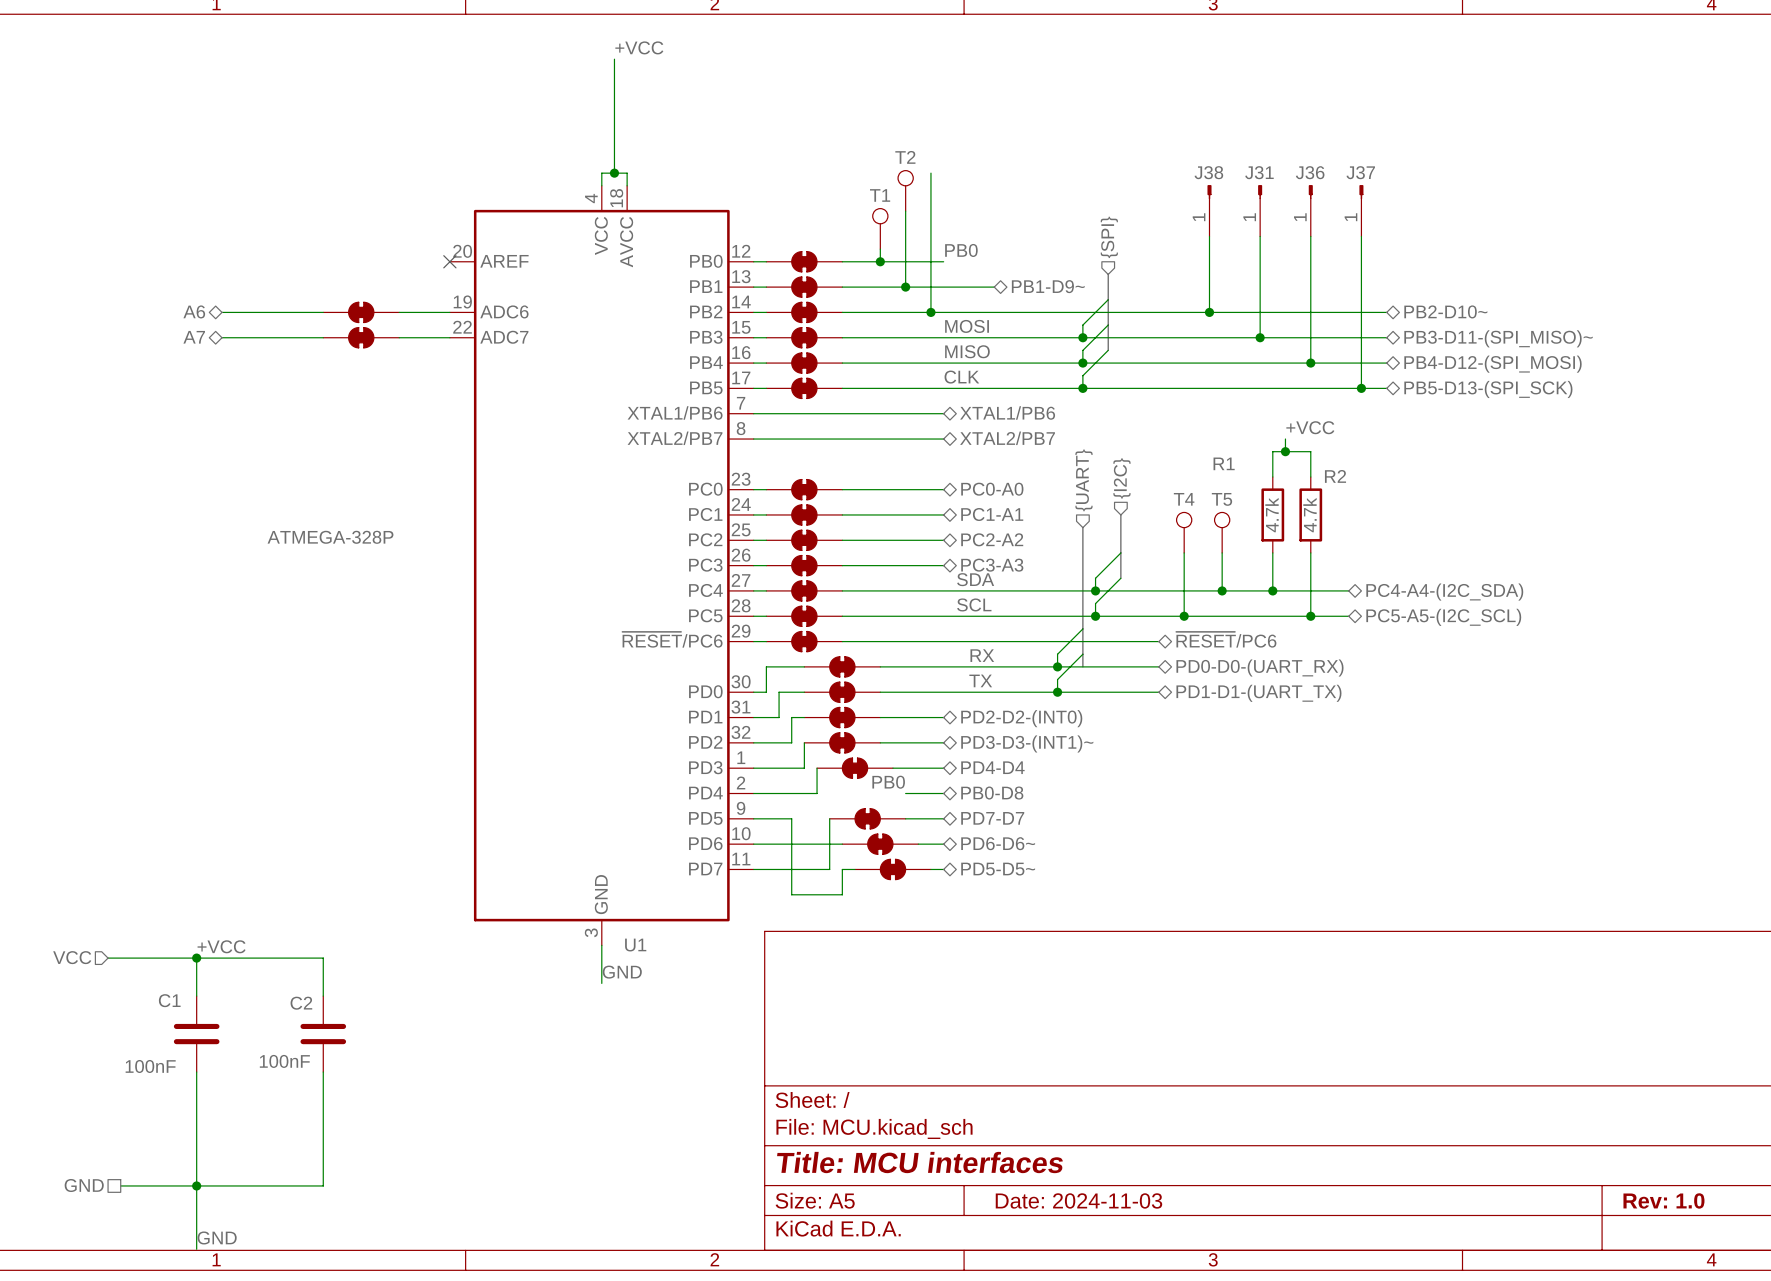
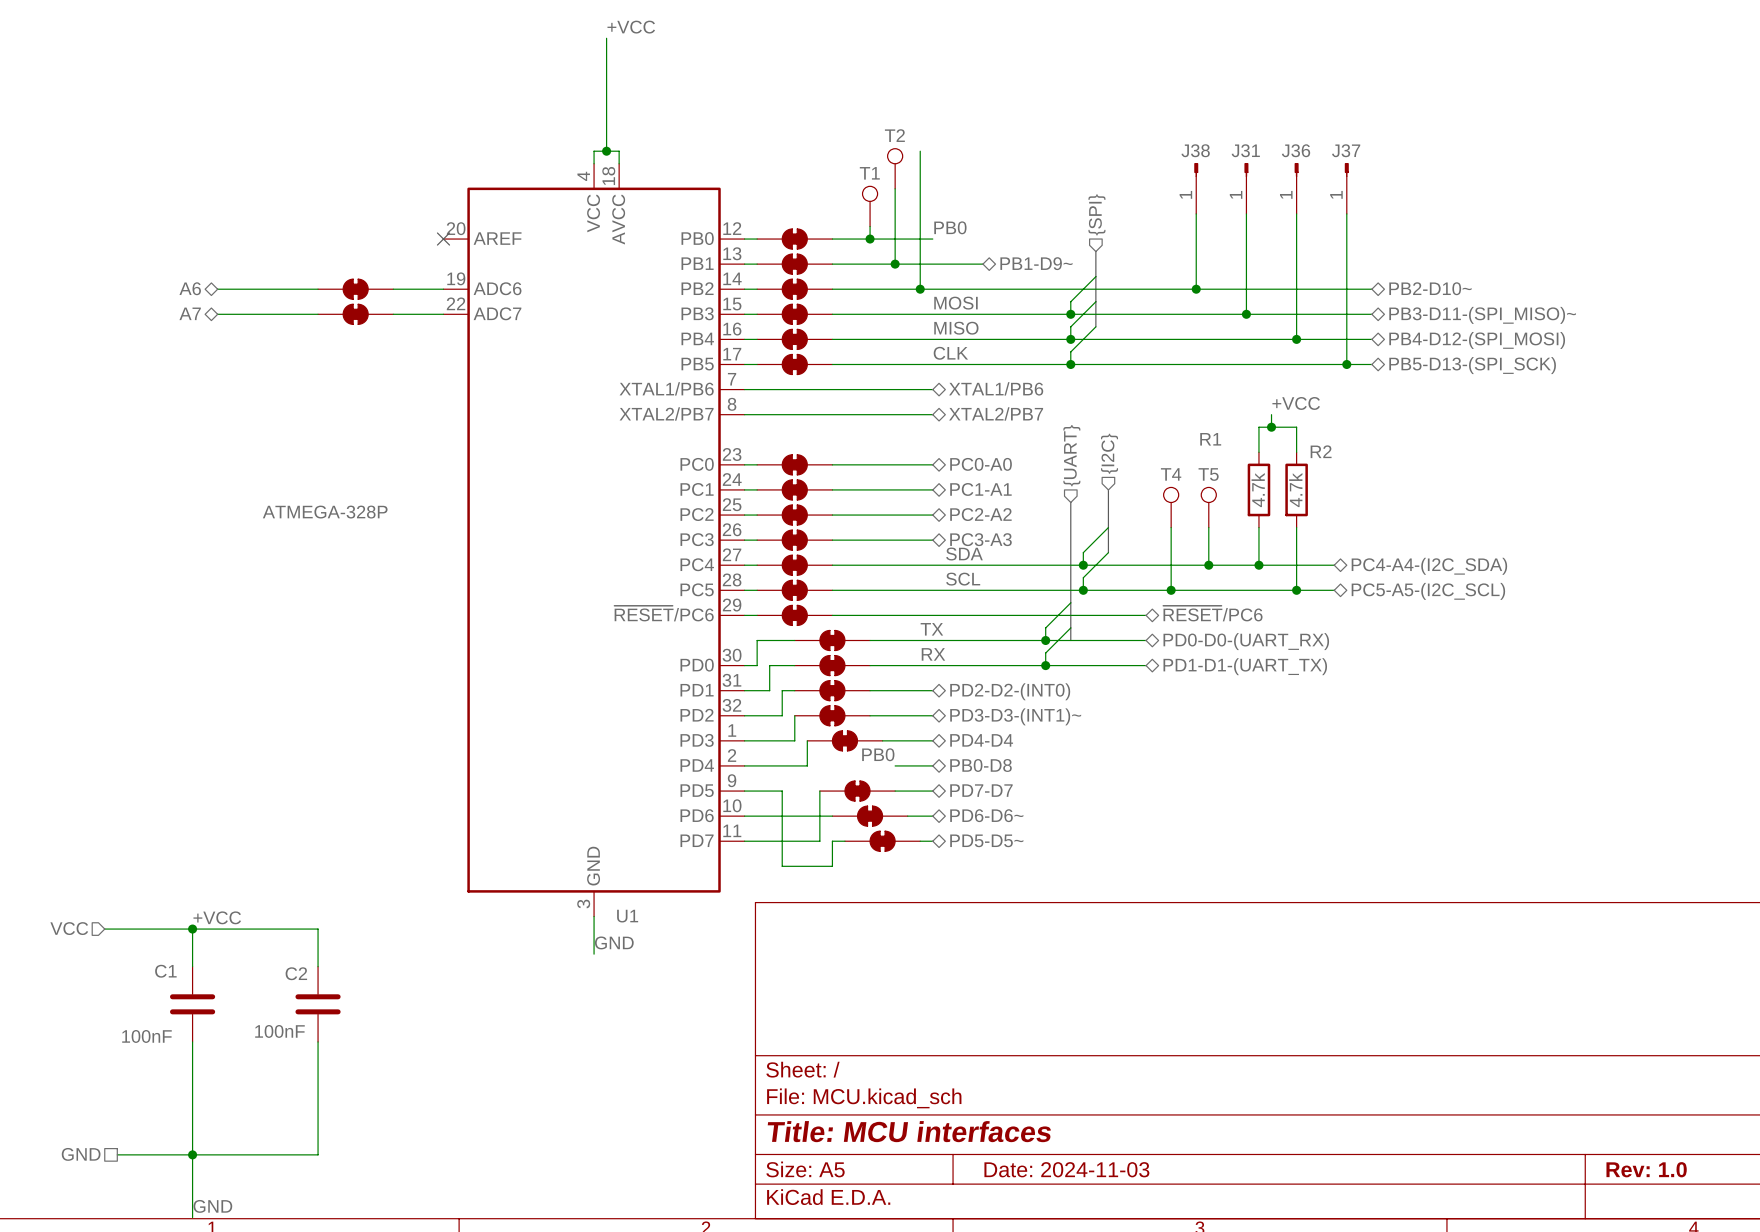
label position: RX (982, 655) -> RX (933, 654)
label position: TX (980, 680) -> TX (931, 629)

